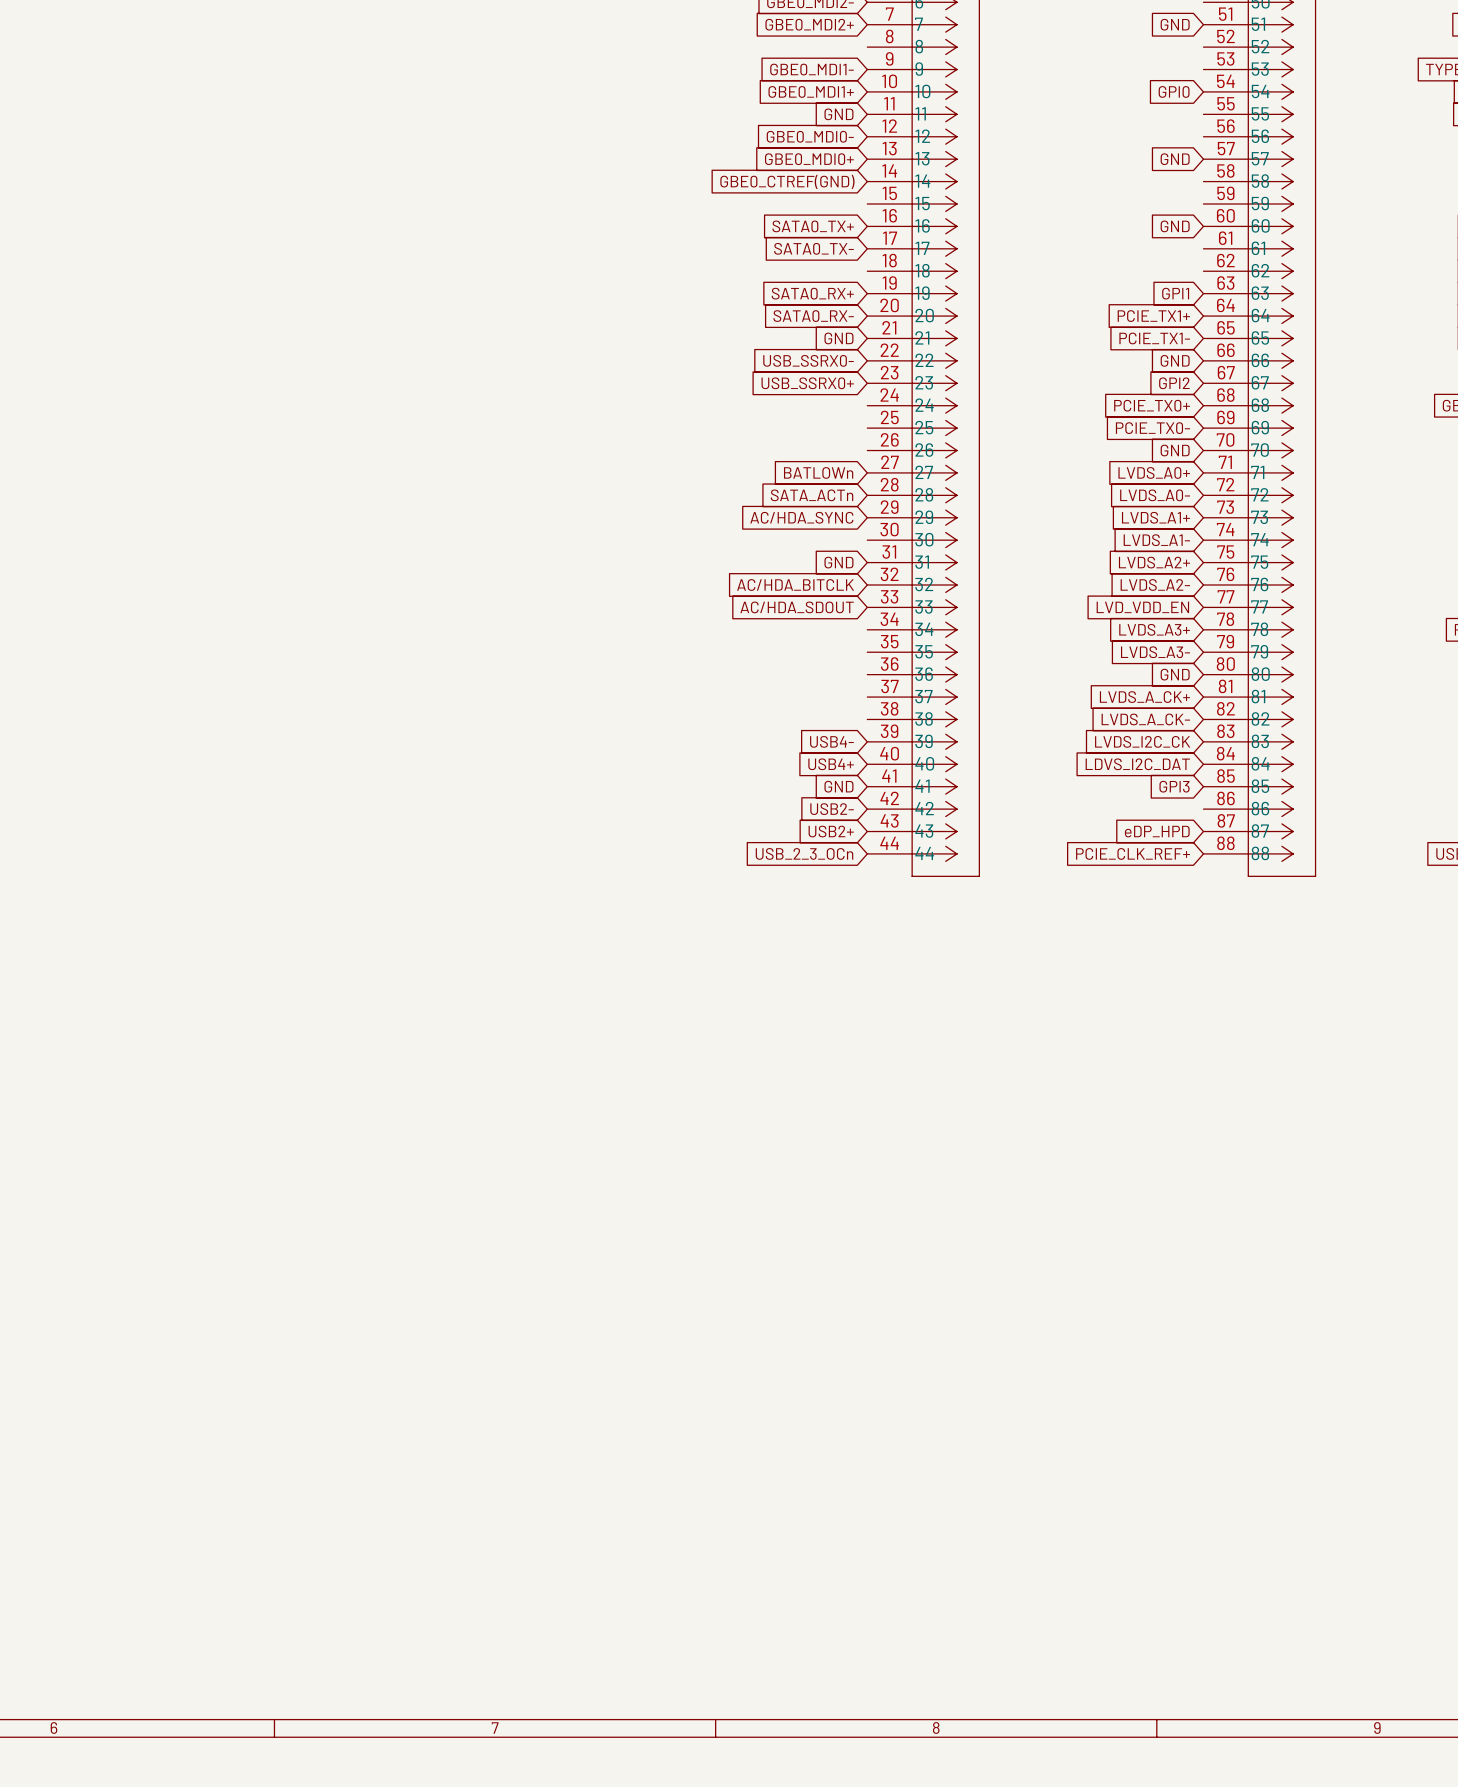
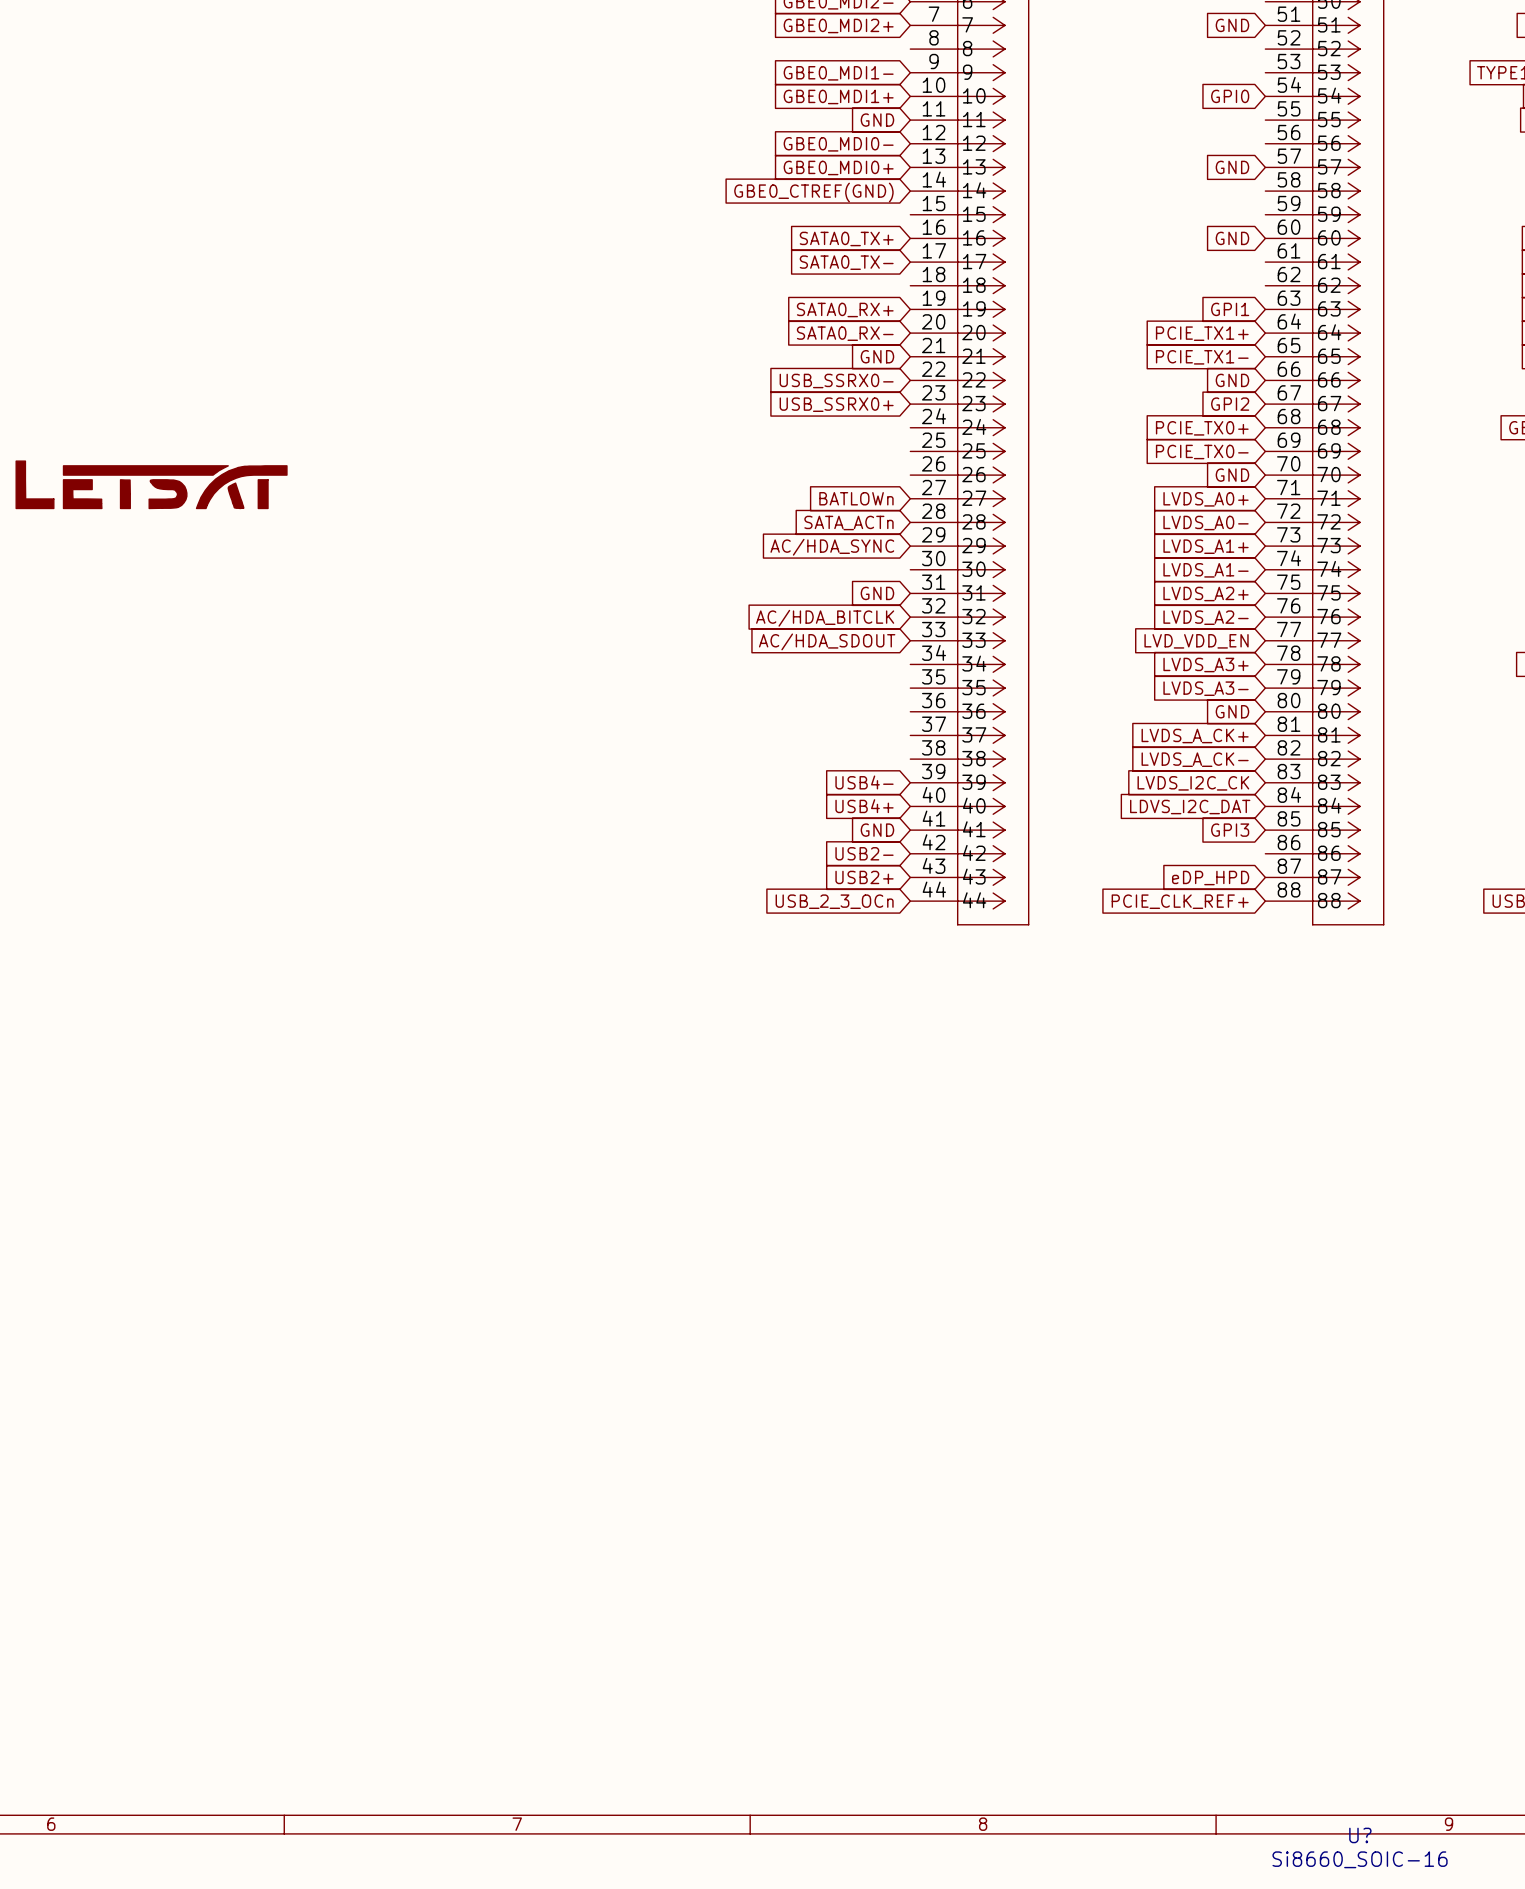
U?: none -> Si8660_SOIC-16 (151, 484)

